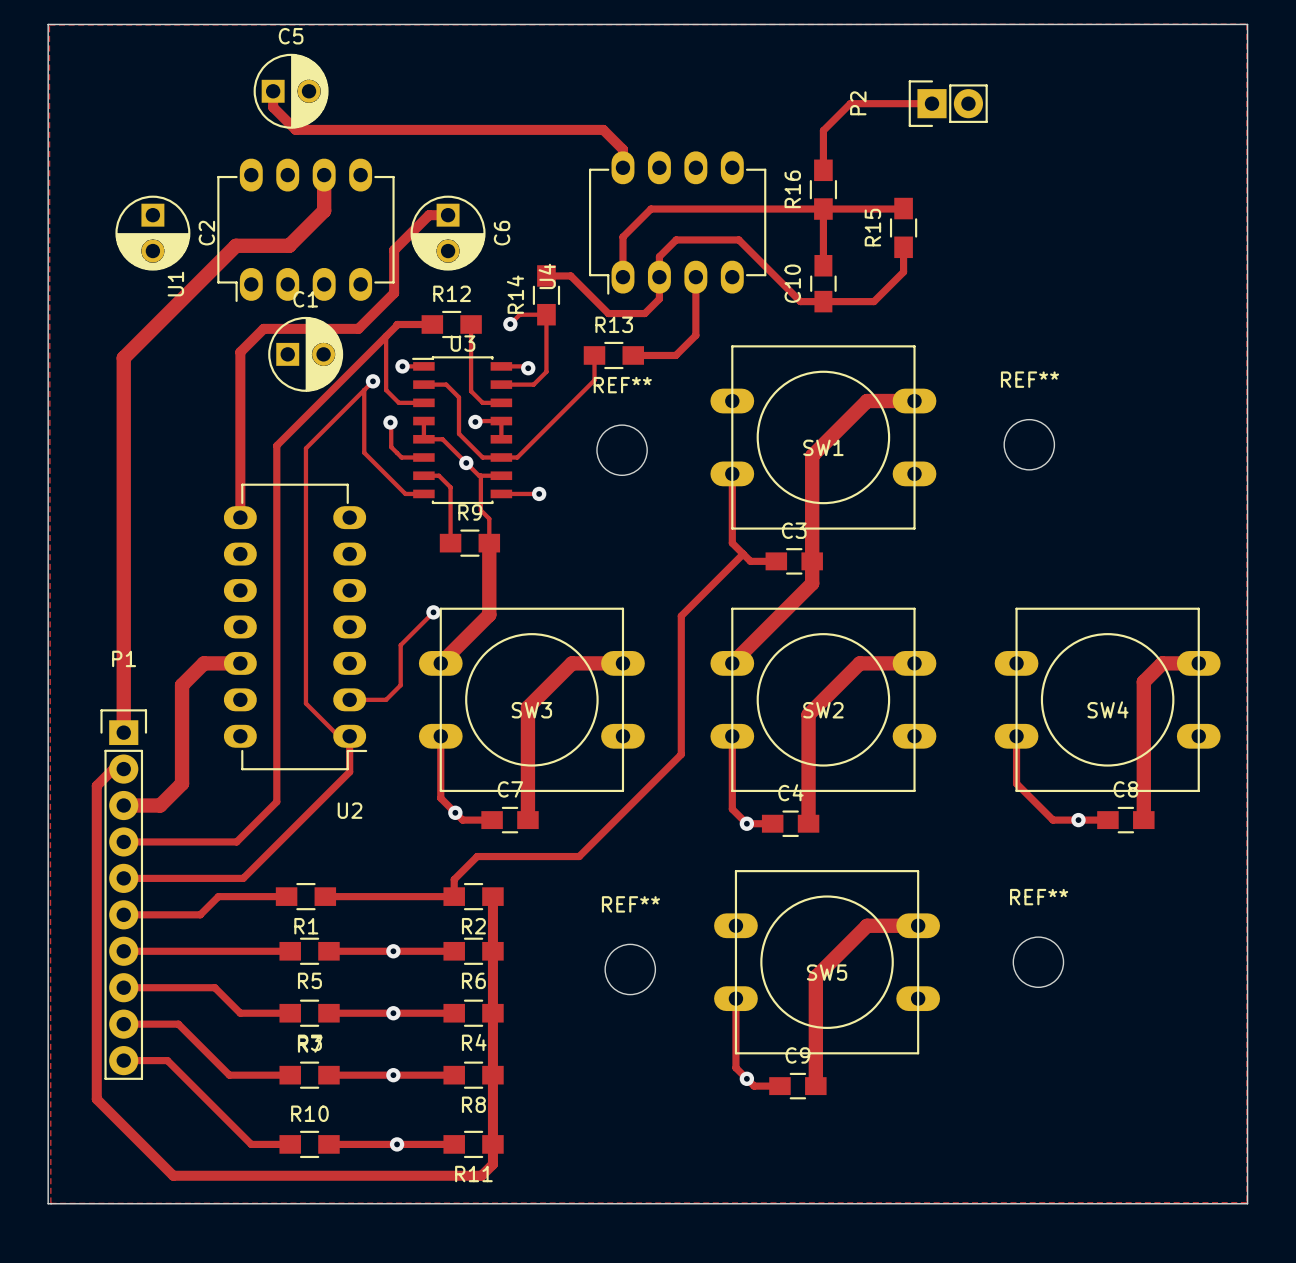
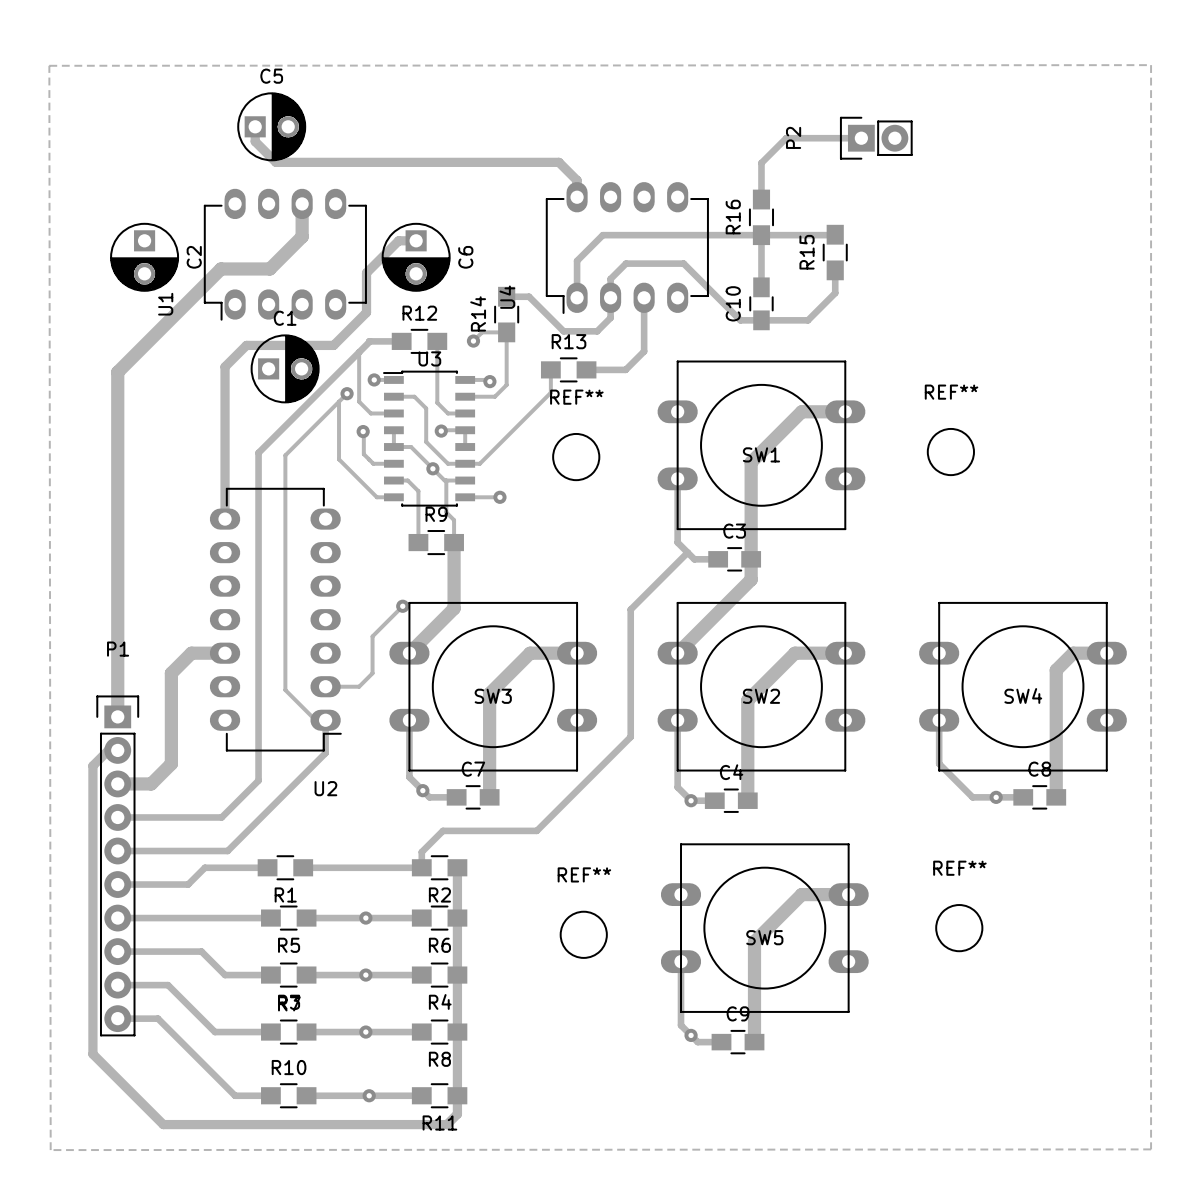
board edge: (48, 24) (48, 1203) (1247, 1203) (1247, 24) (48, 24) -> none

